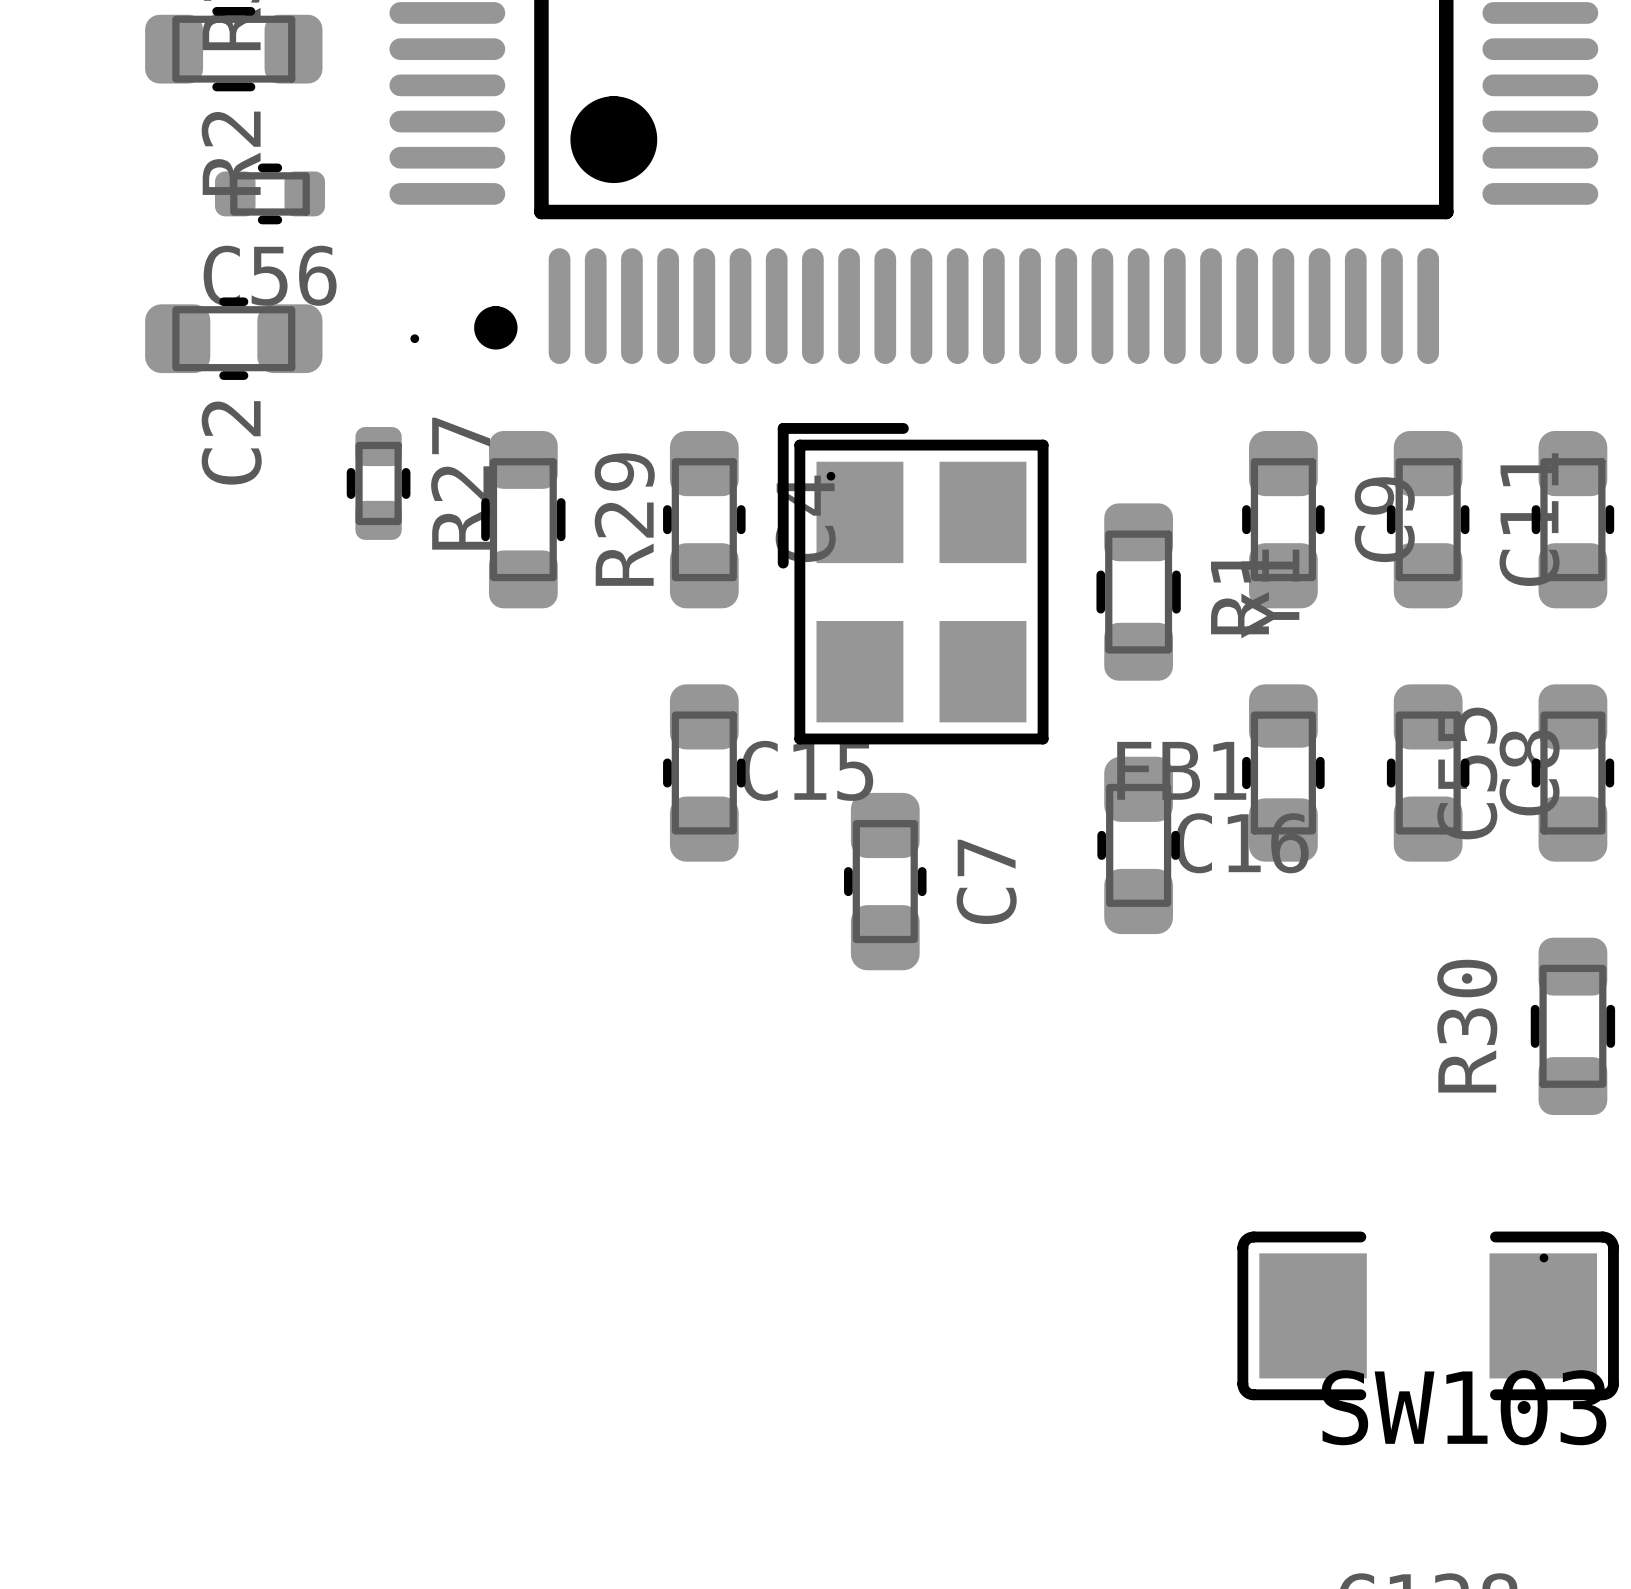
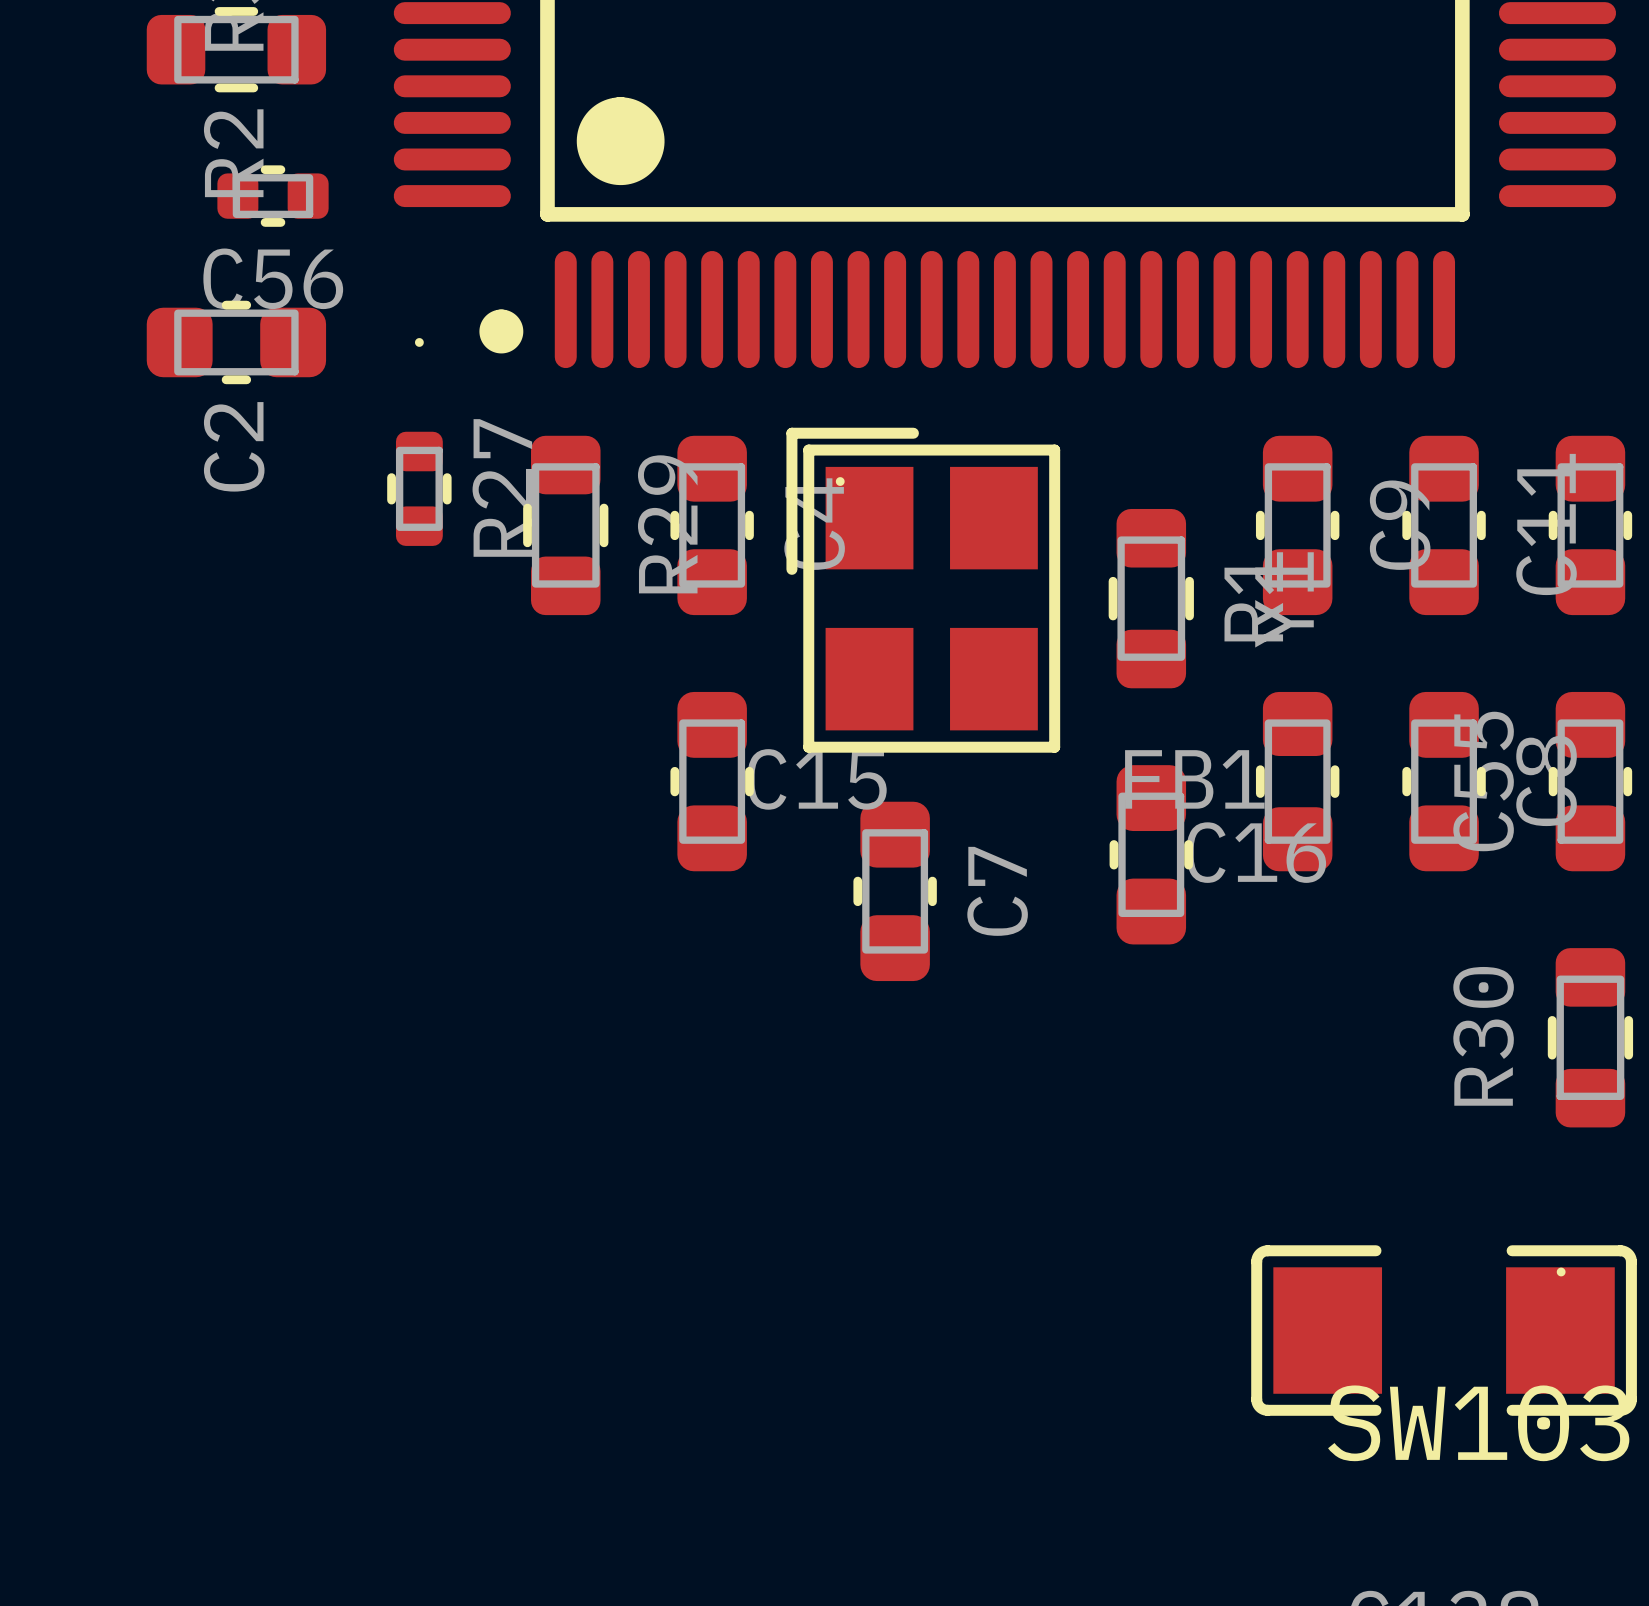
R27 position: (378, 483) -> (419, 488)
R29 position: (523, 519) -> (565, 525)

